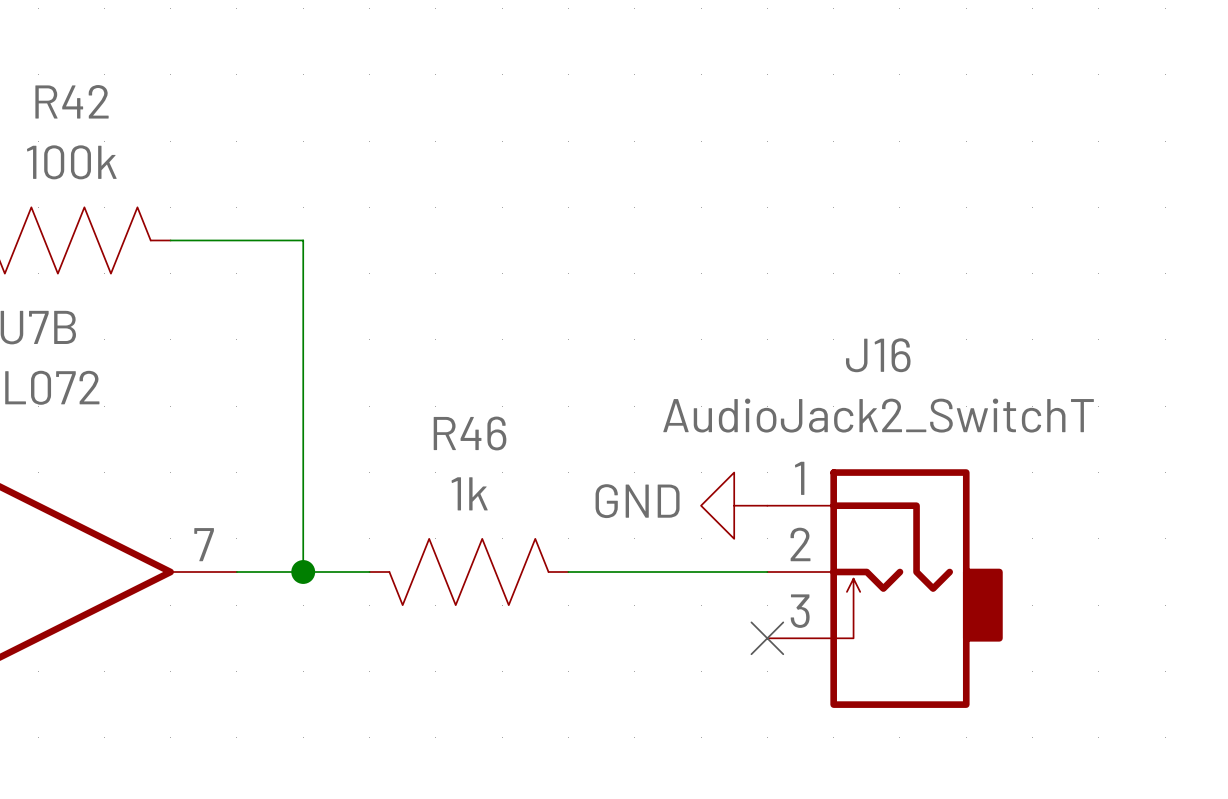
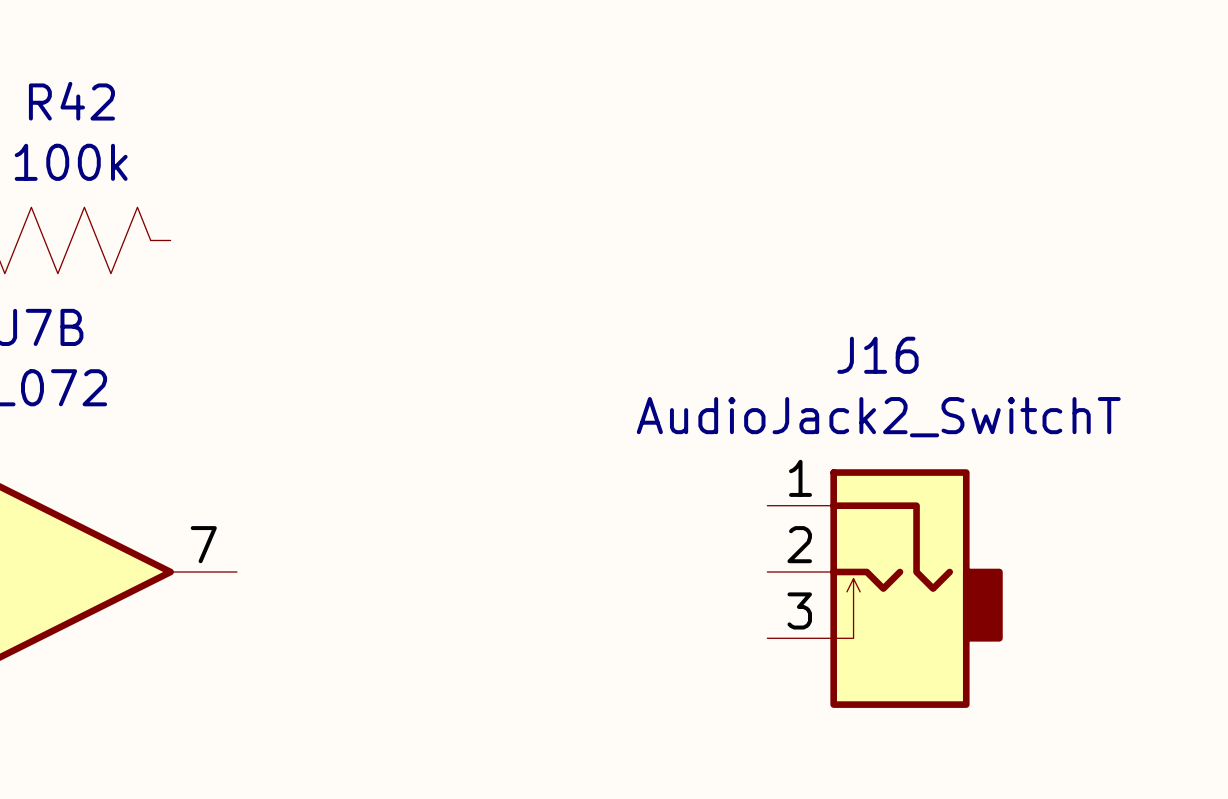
wire: (170, 240) (303, 240) (303, 572) -> none
power symbol: GND (734, 505) -> none
wire: (236, 572) (369, 572) -> none
junction: (303, 572) -> none
R46: 1k (468, 572) -> none
wire: (568, 572) (767, 572) -> none
no-connect mark: (767, 638) -> none

